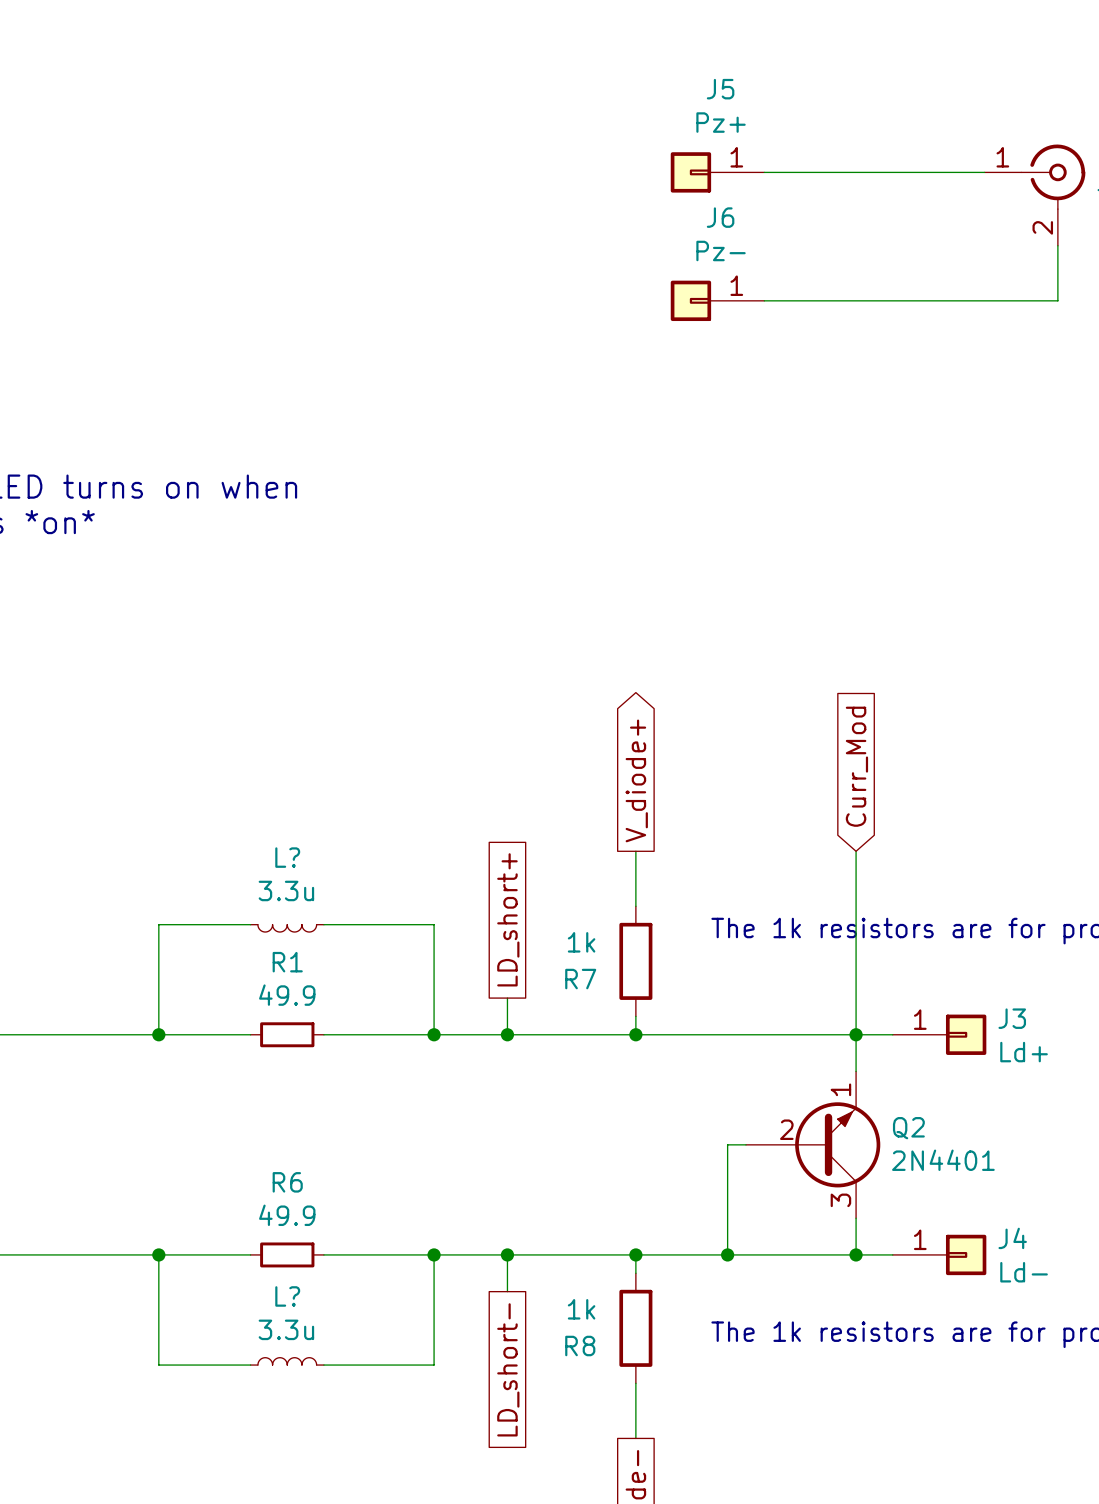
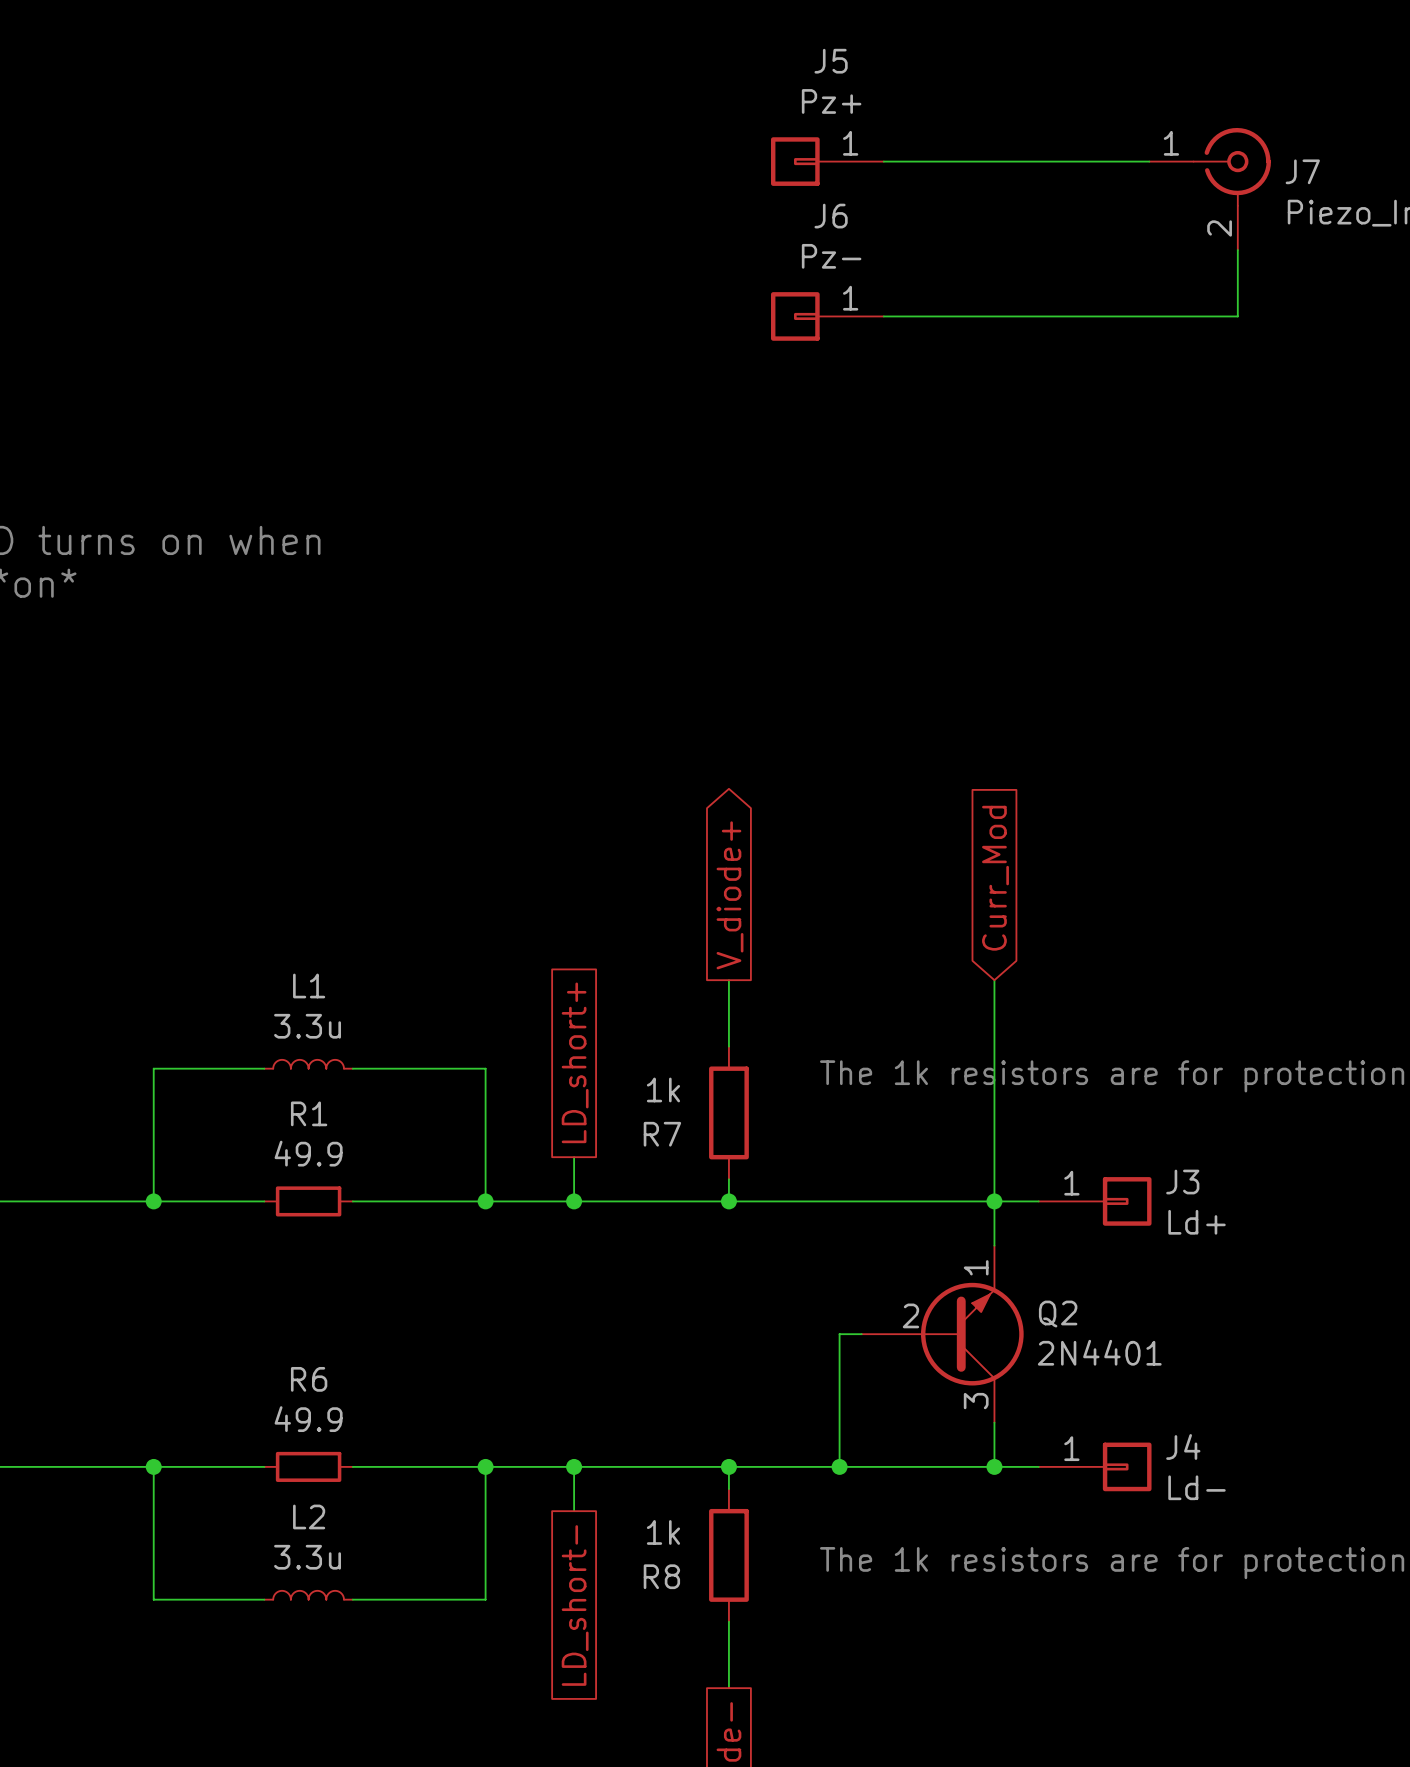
L1: none -> 3.3u (308, 1064)
L?: 3.3u (287, 928) -> none
L? name: L? (287, 1296) -> L2 (309, 1516)

